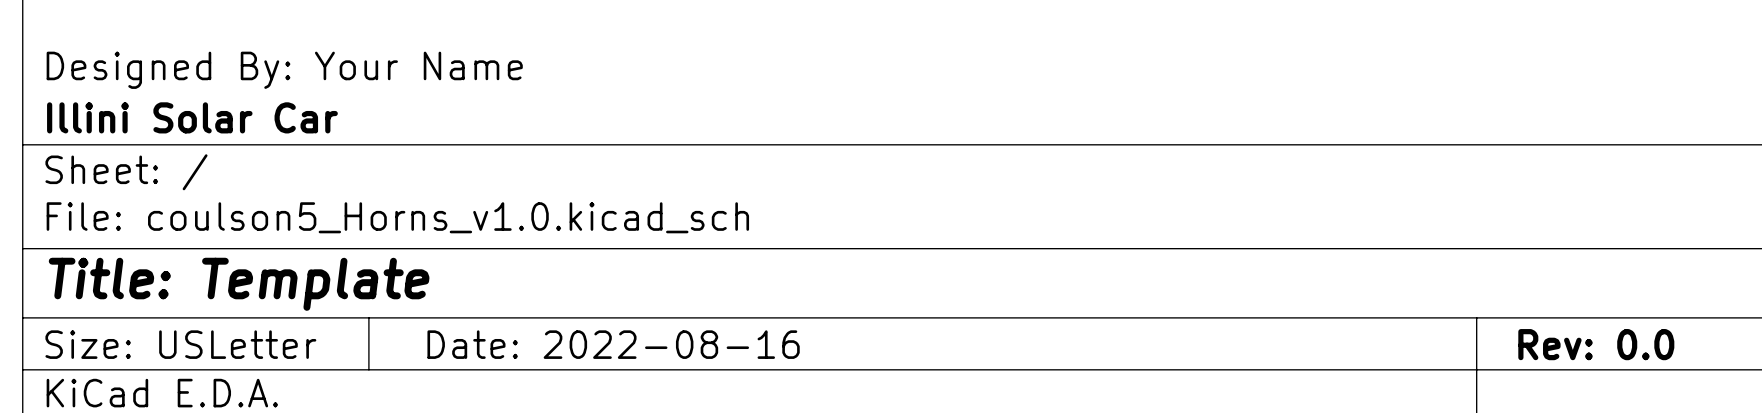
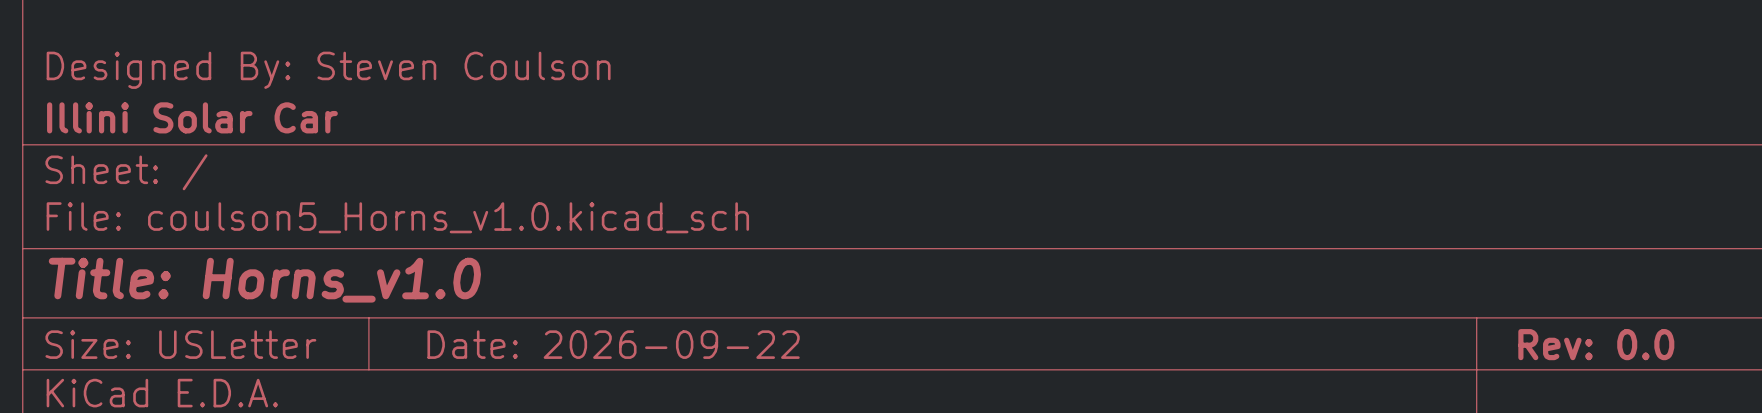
title block: Designed By: Your Name (284, 70) -> Designed By: Steven Coulson (328, 70)
title block: Title: Template (239, 284) -> Title: Horns_v1.0 (264, 280)
title block: Date: 2022-08-16 (613, 344) -> Date: 2026-09-22 (613, 344)

